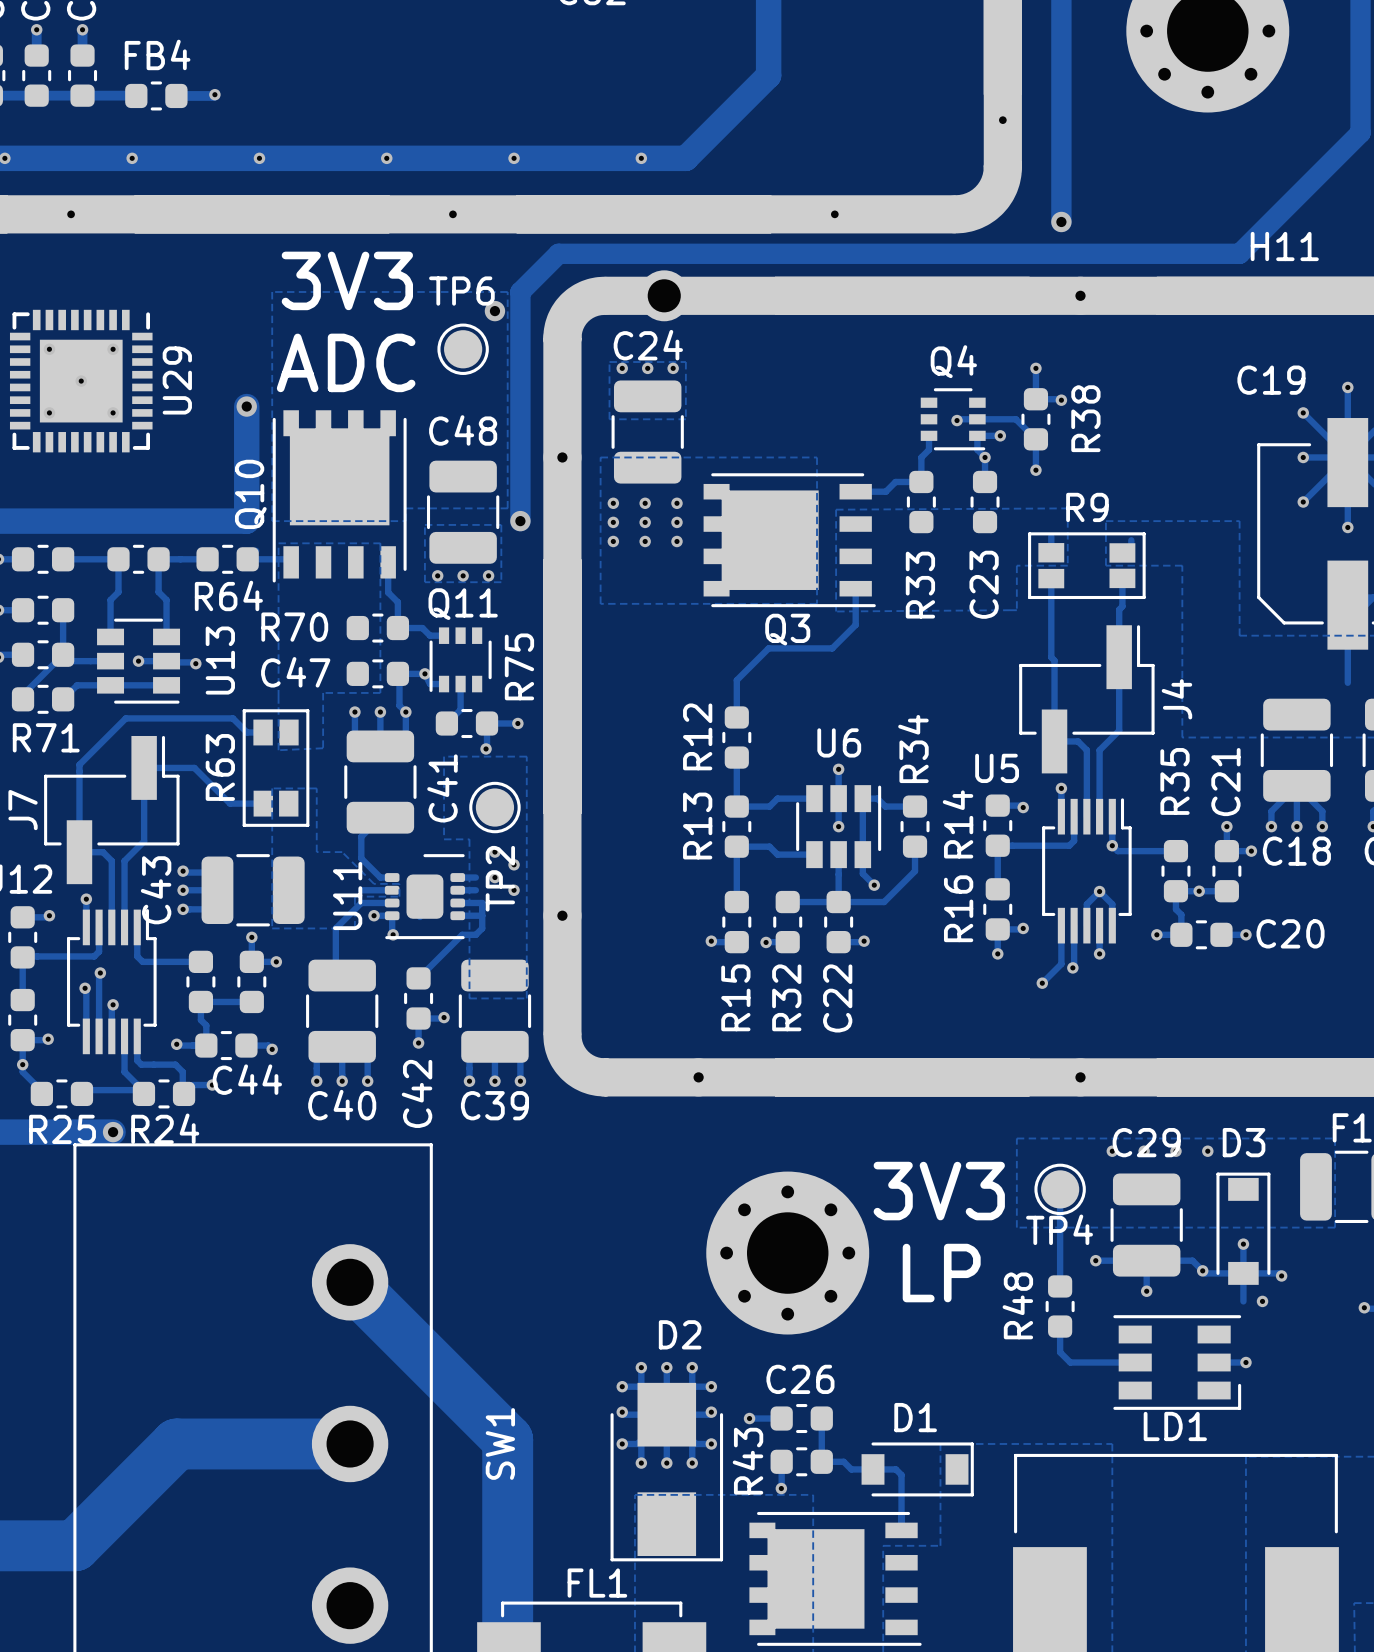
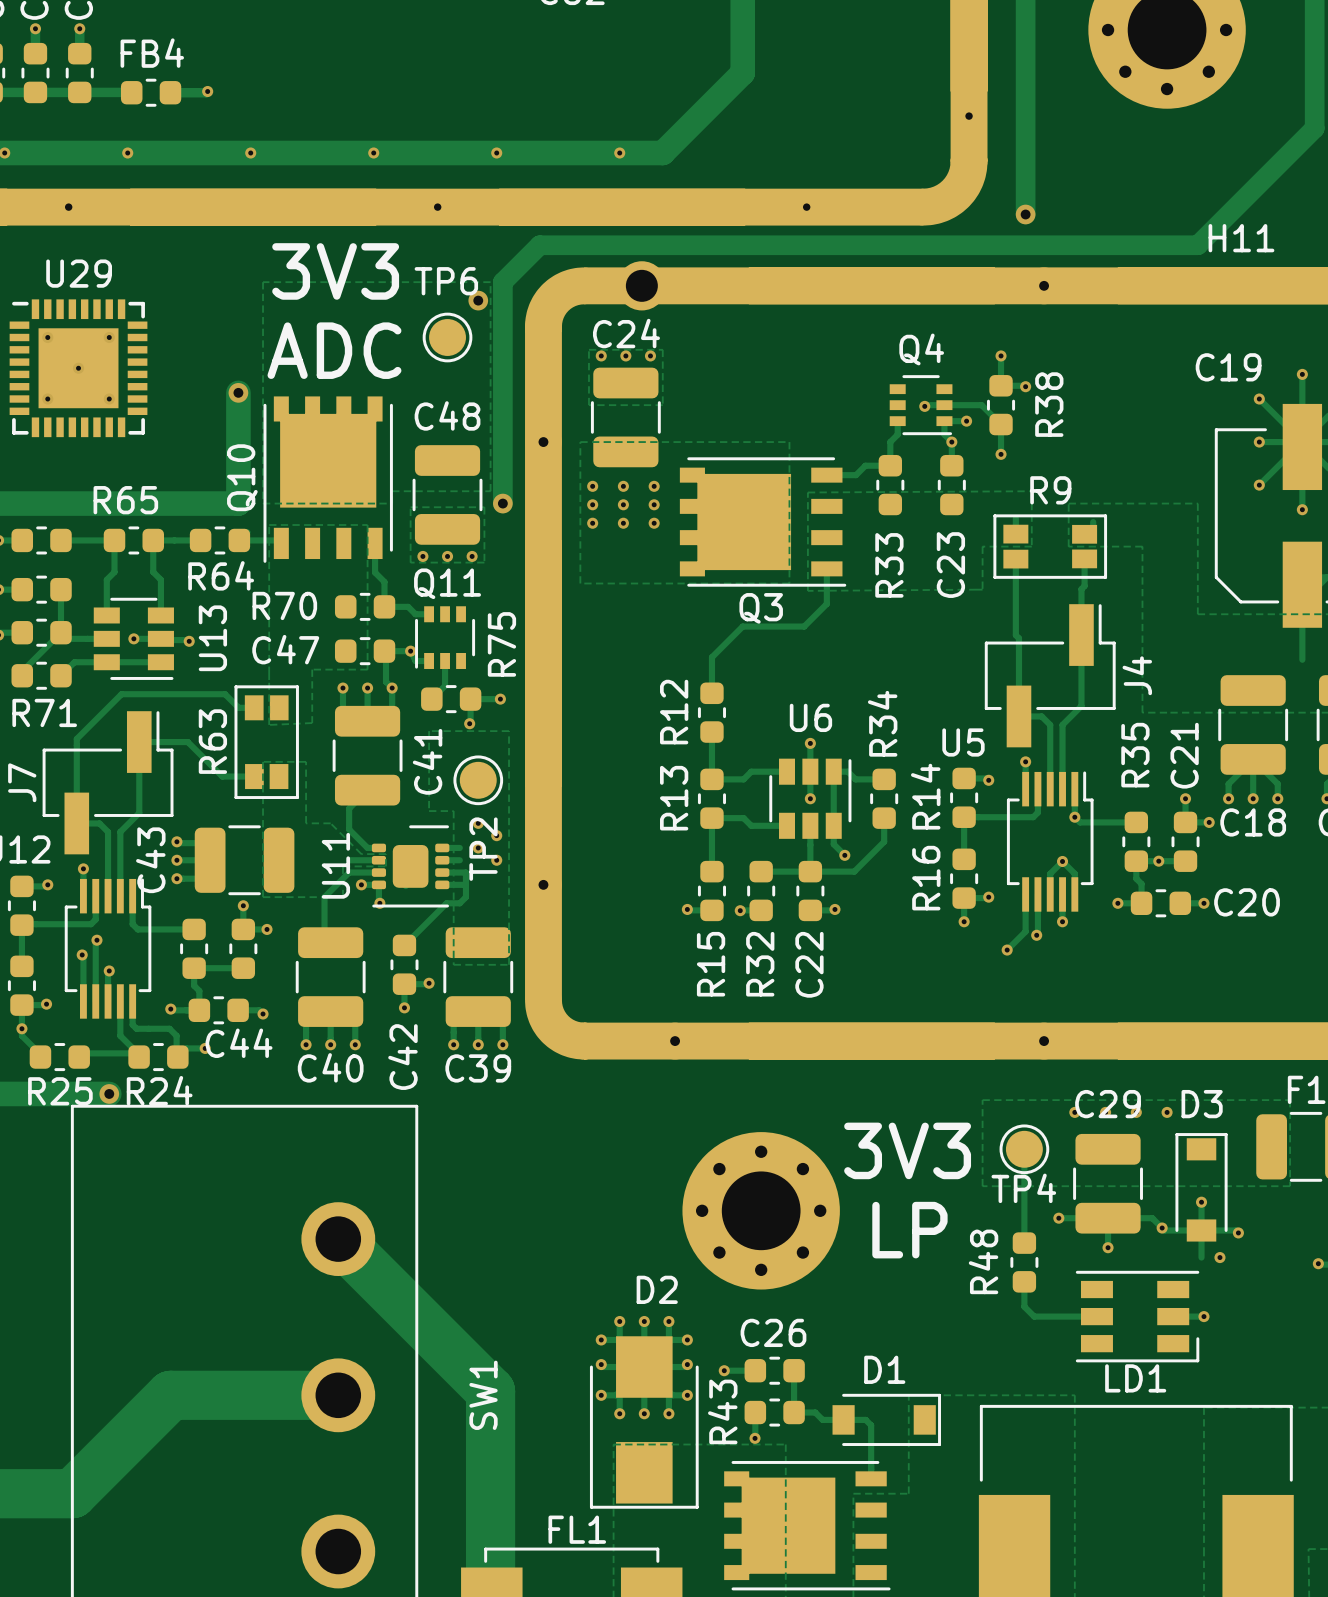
U29 rotation: 0° (81, 381) -> 90° counterclockwise (78, 368)
R65 name: none -> R65 (125, 500)

